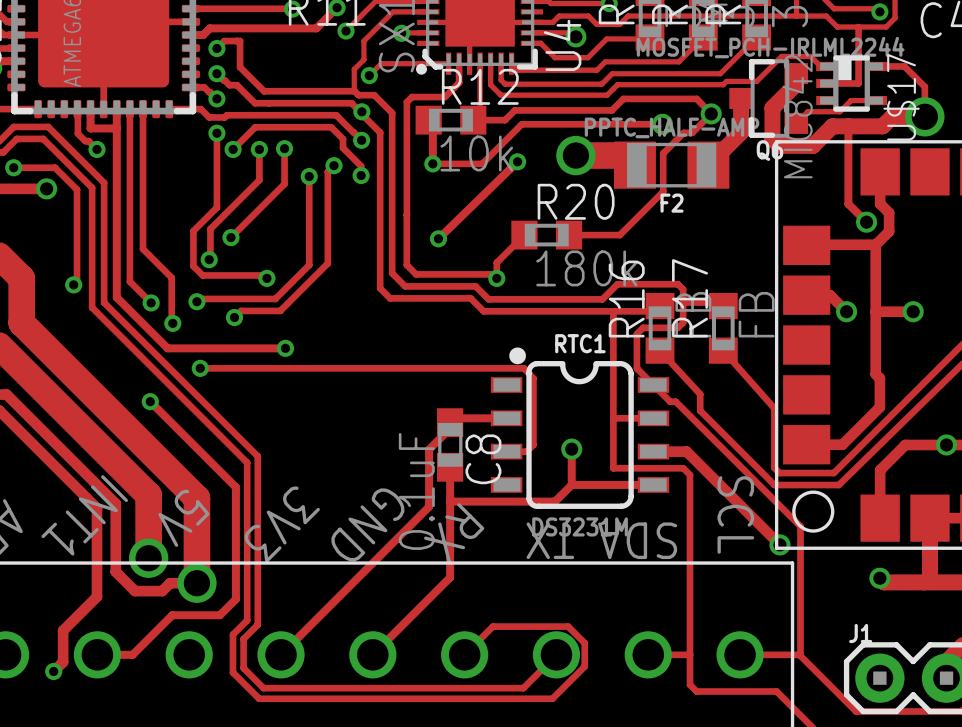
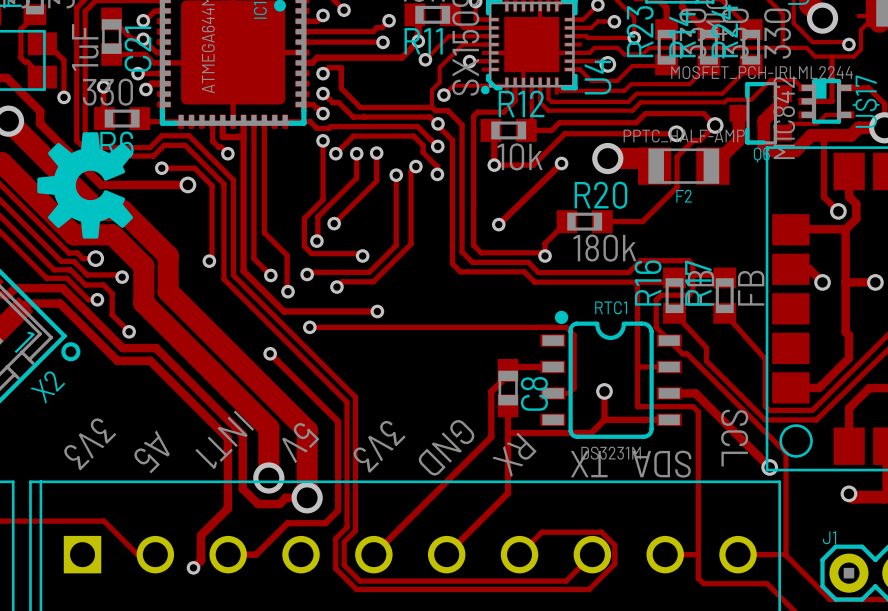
C8 value: 0.1uF (416, 491) -> none

